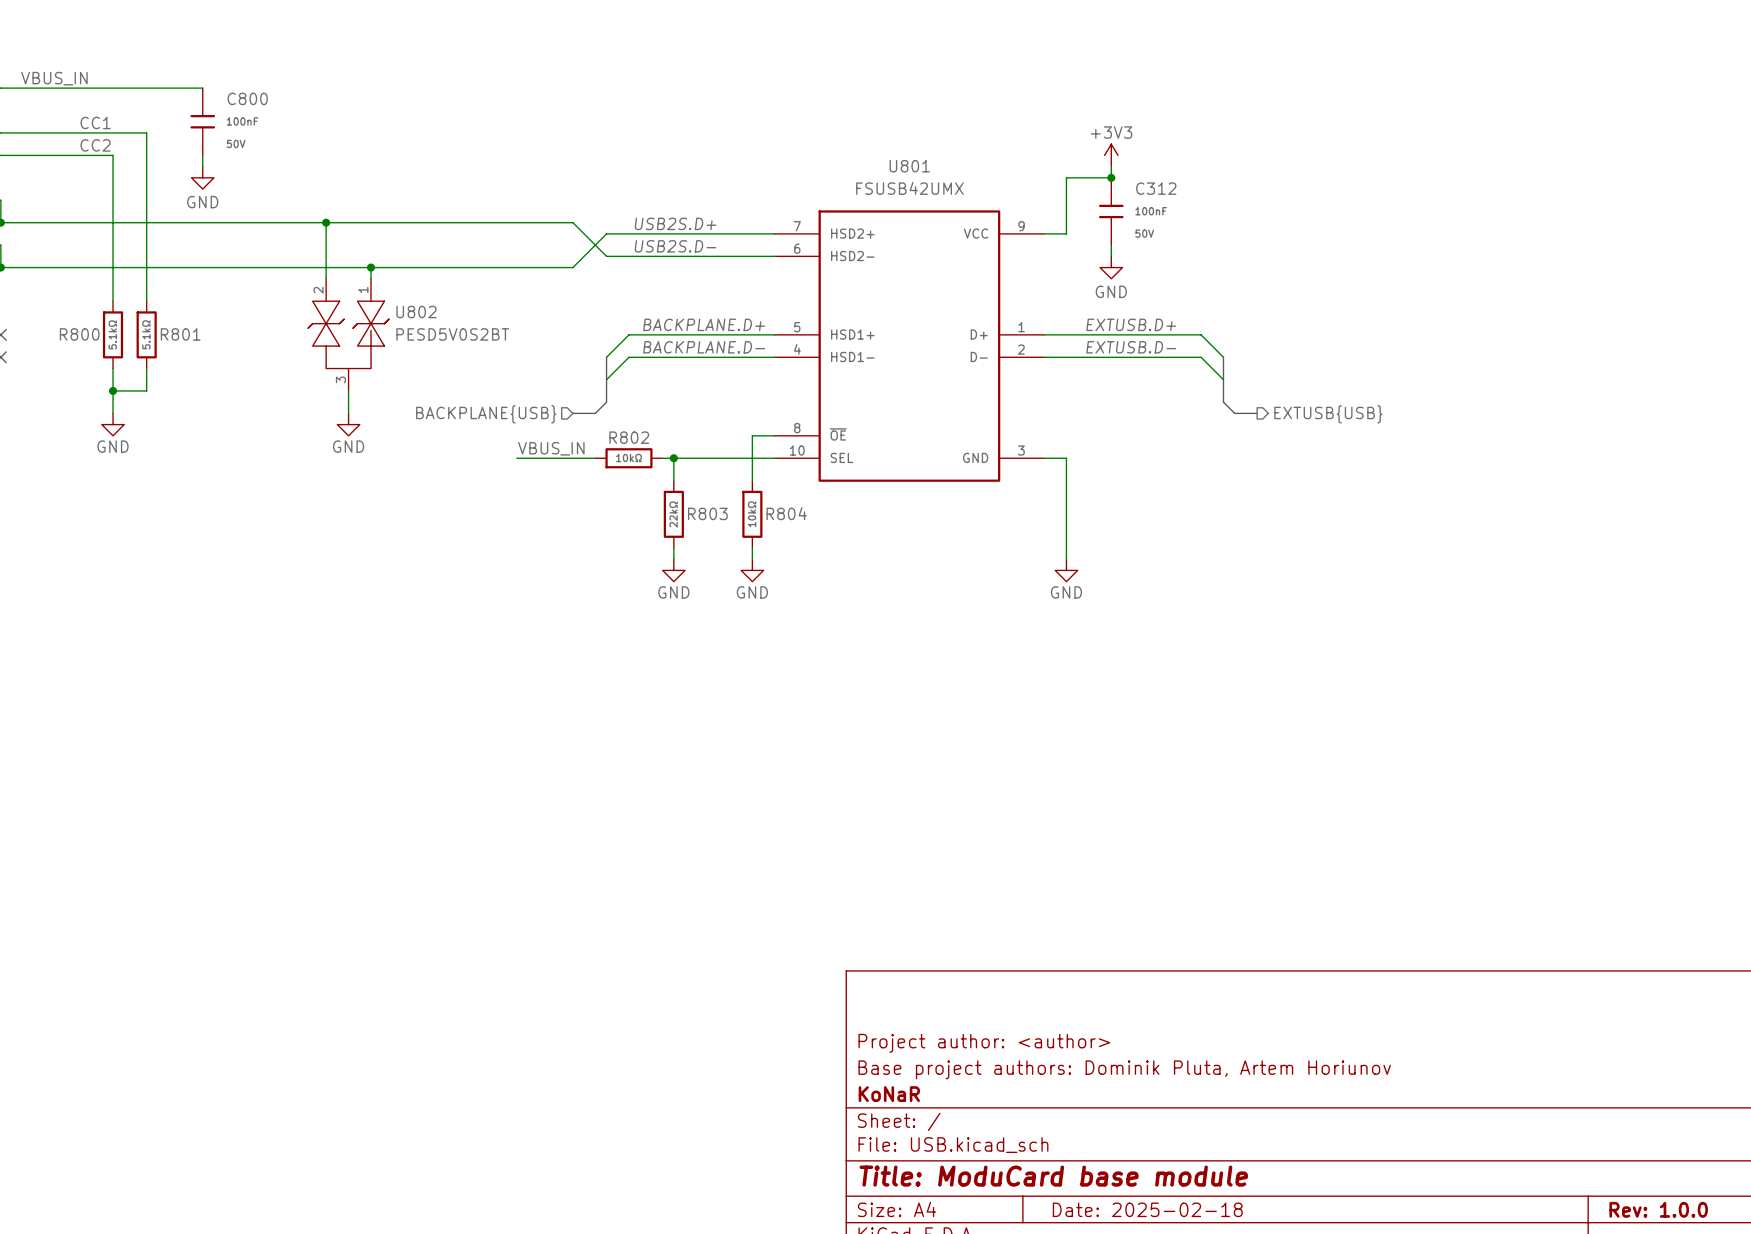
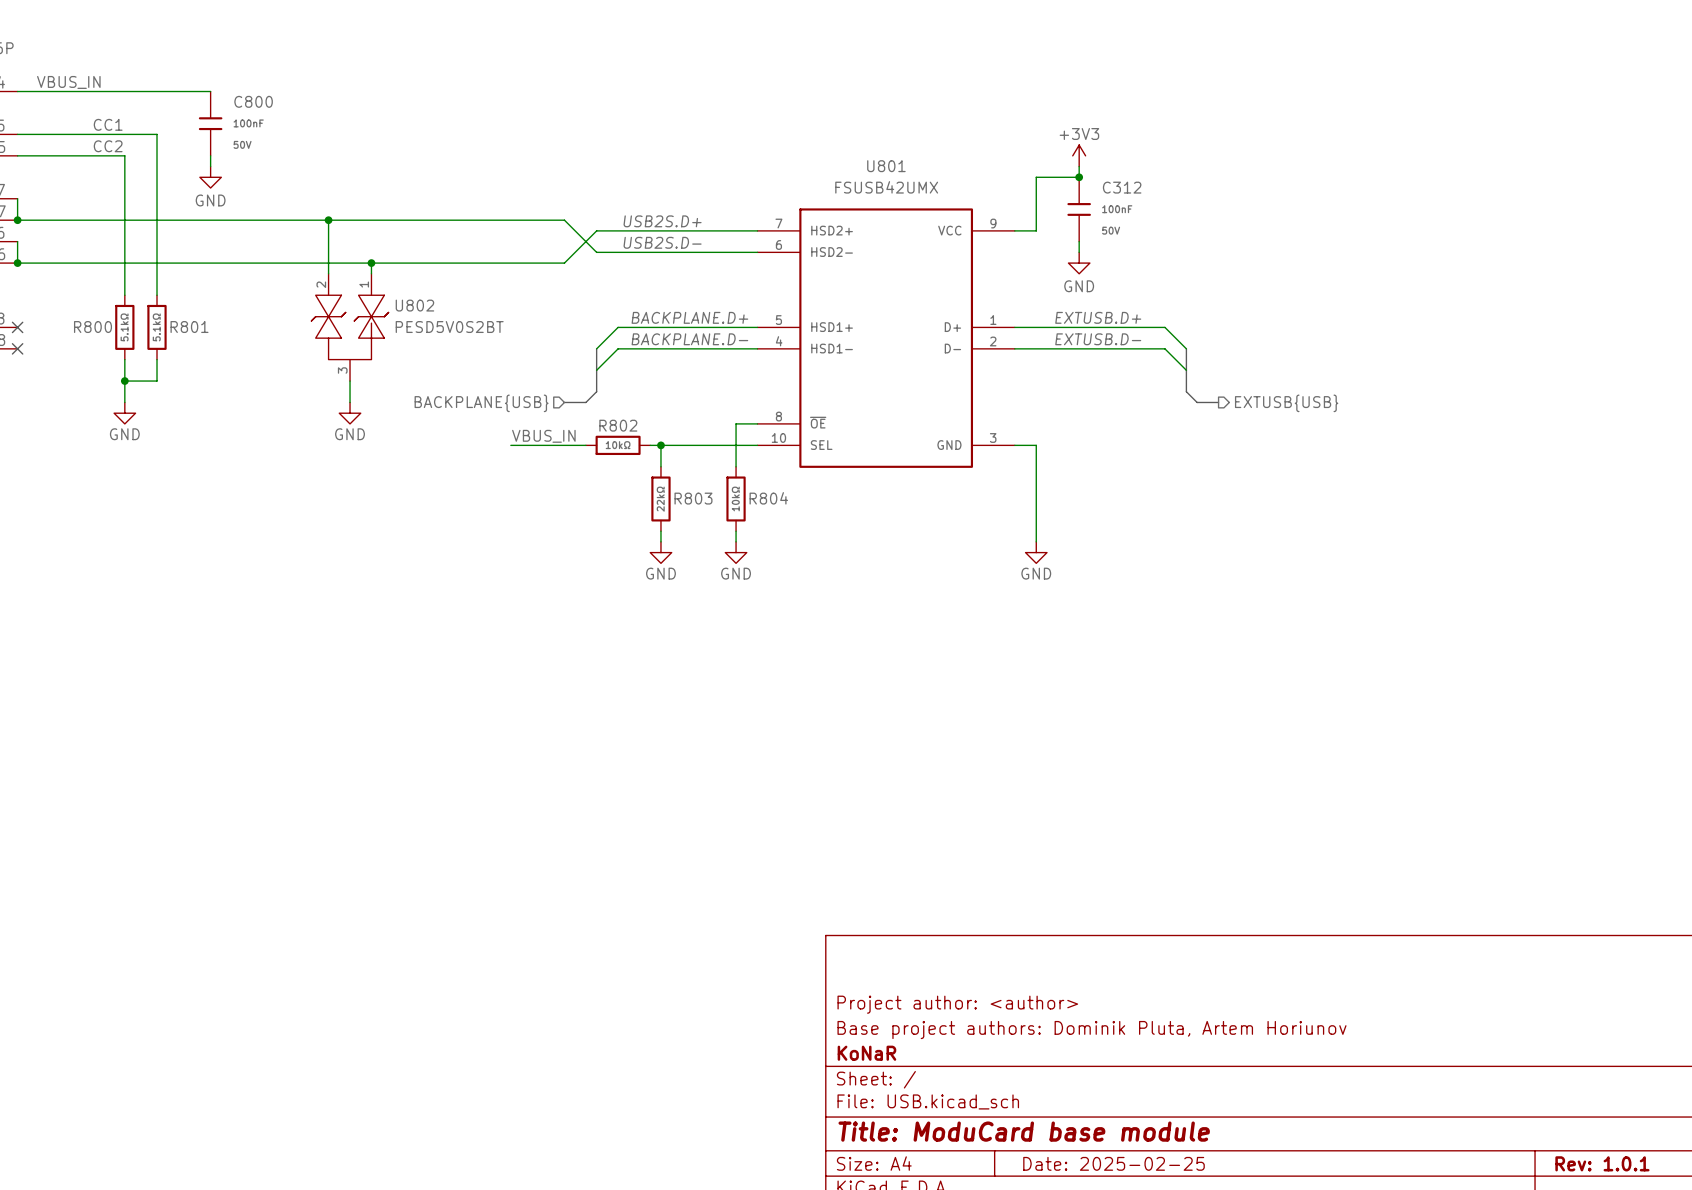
title block: Date: 2025-02-18 (1147, 1209) -> Date: 2025-02-25 (1114, 1163)
title block: Rev: 1.0.0 (1658, 1209) -> Rev: 1.0.1 (1602, 1163)

